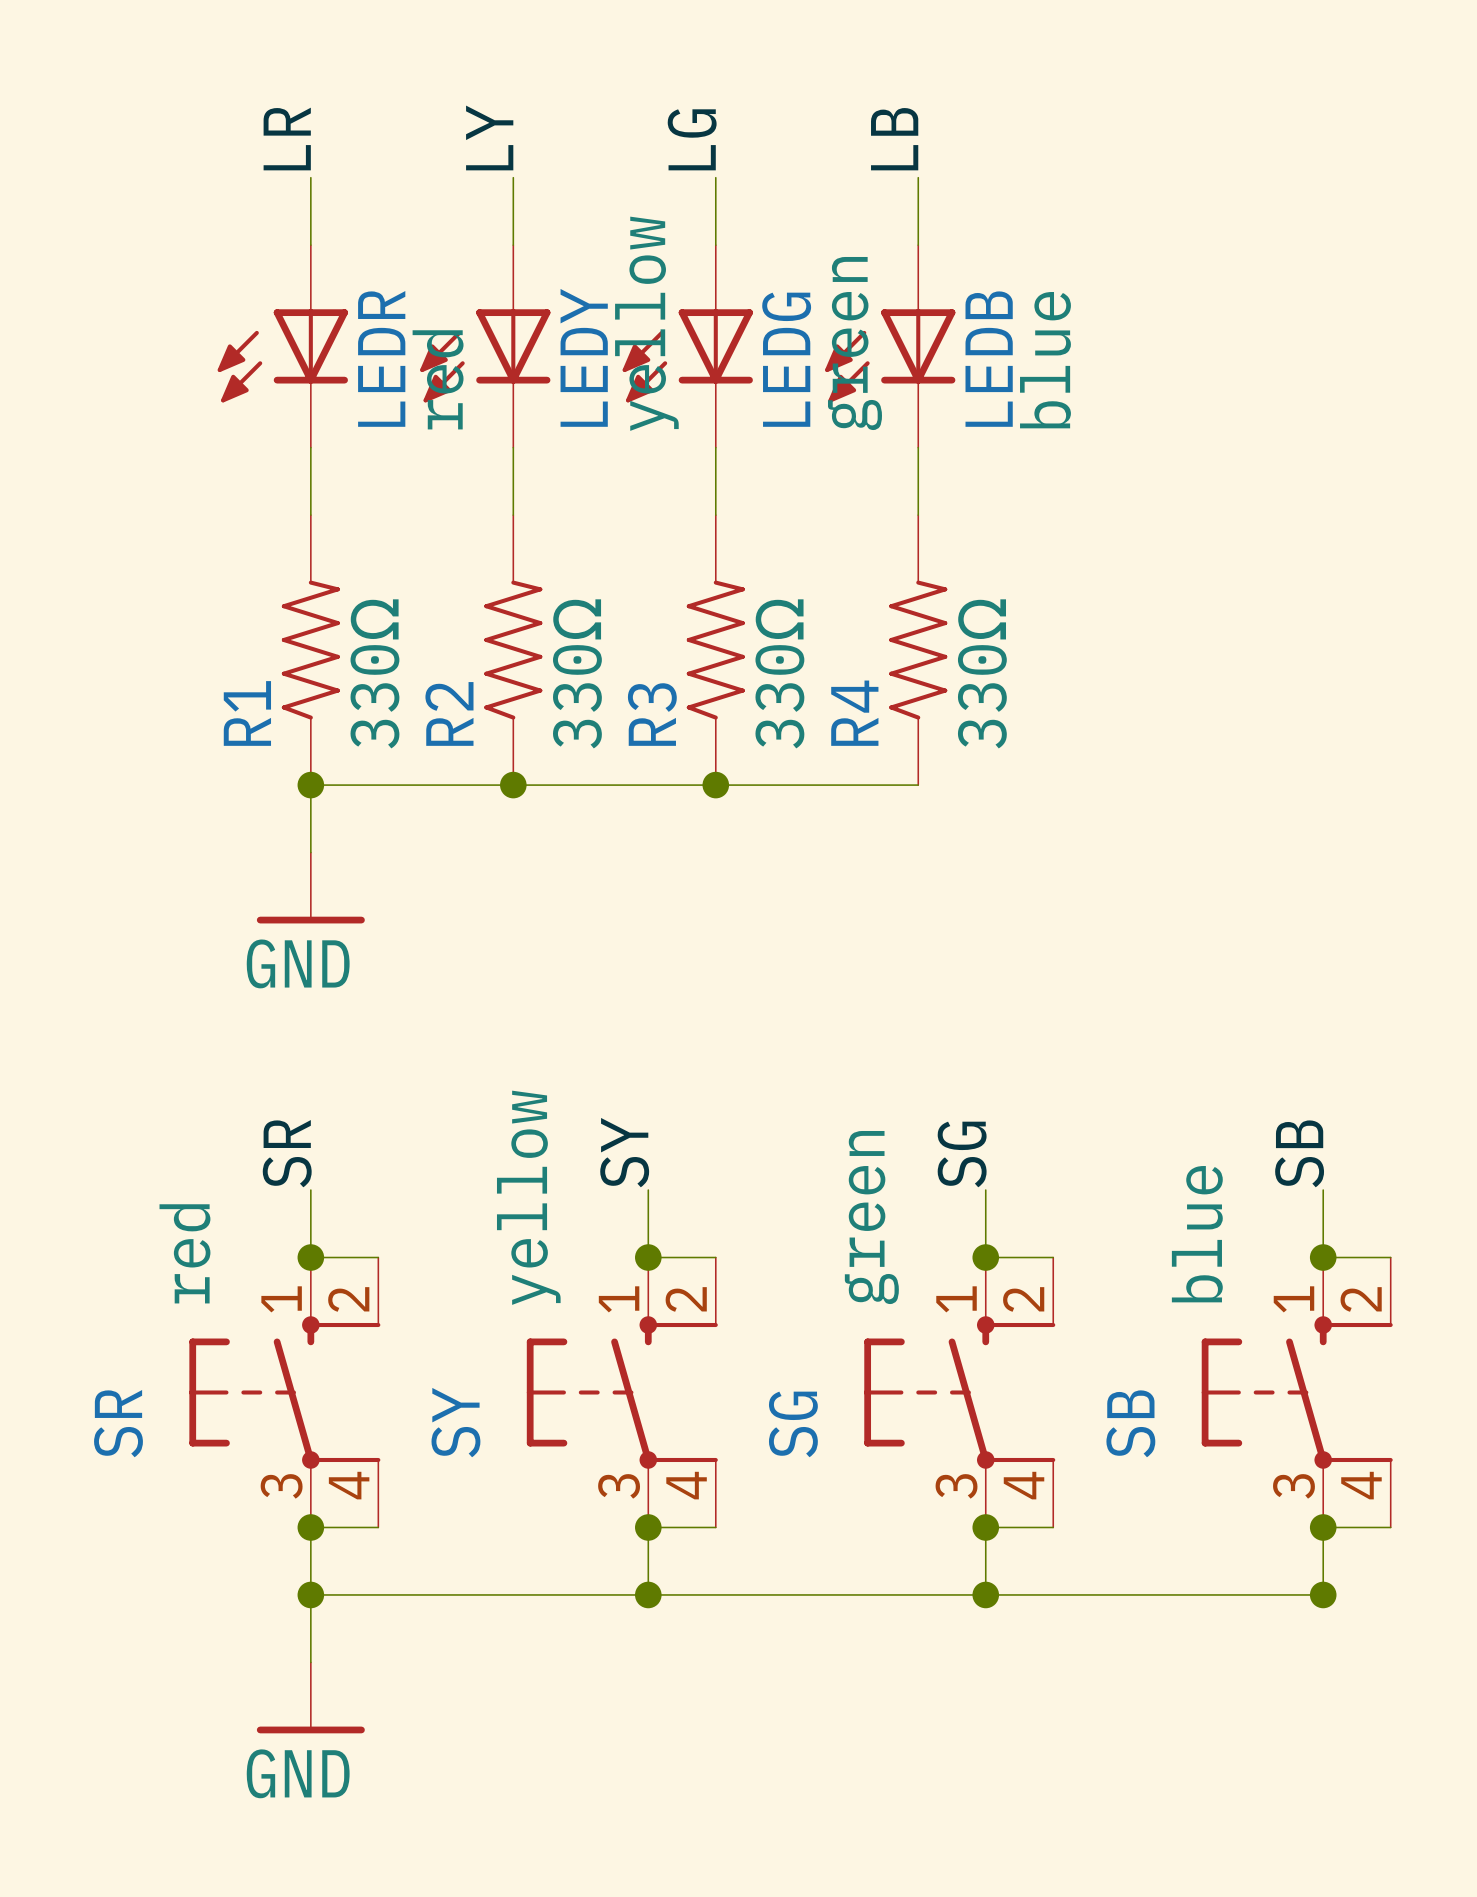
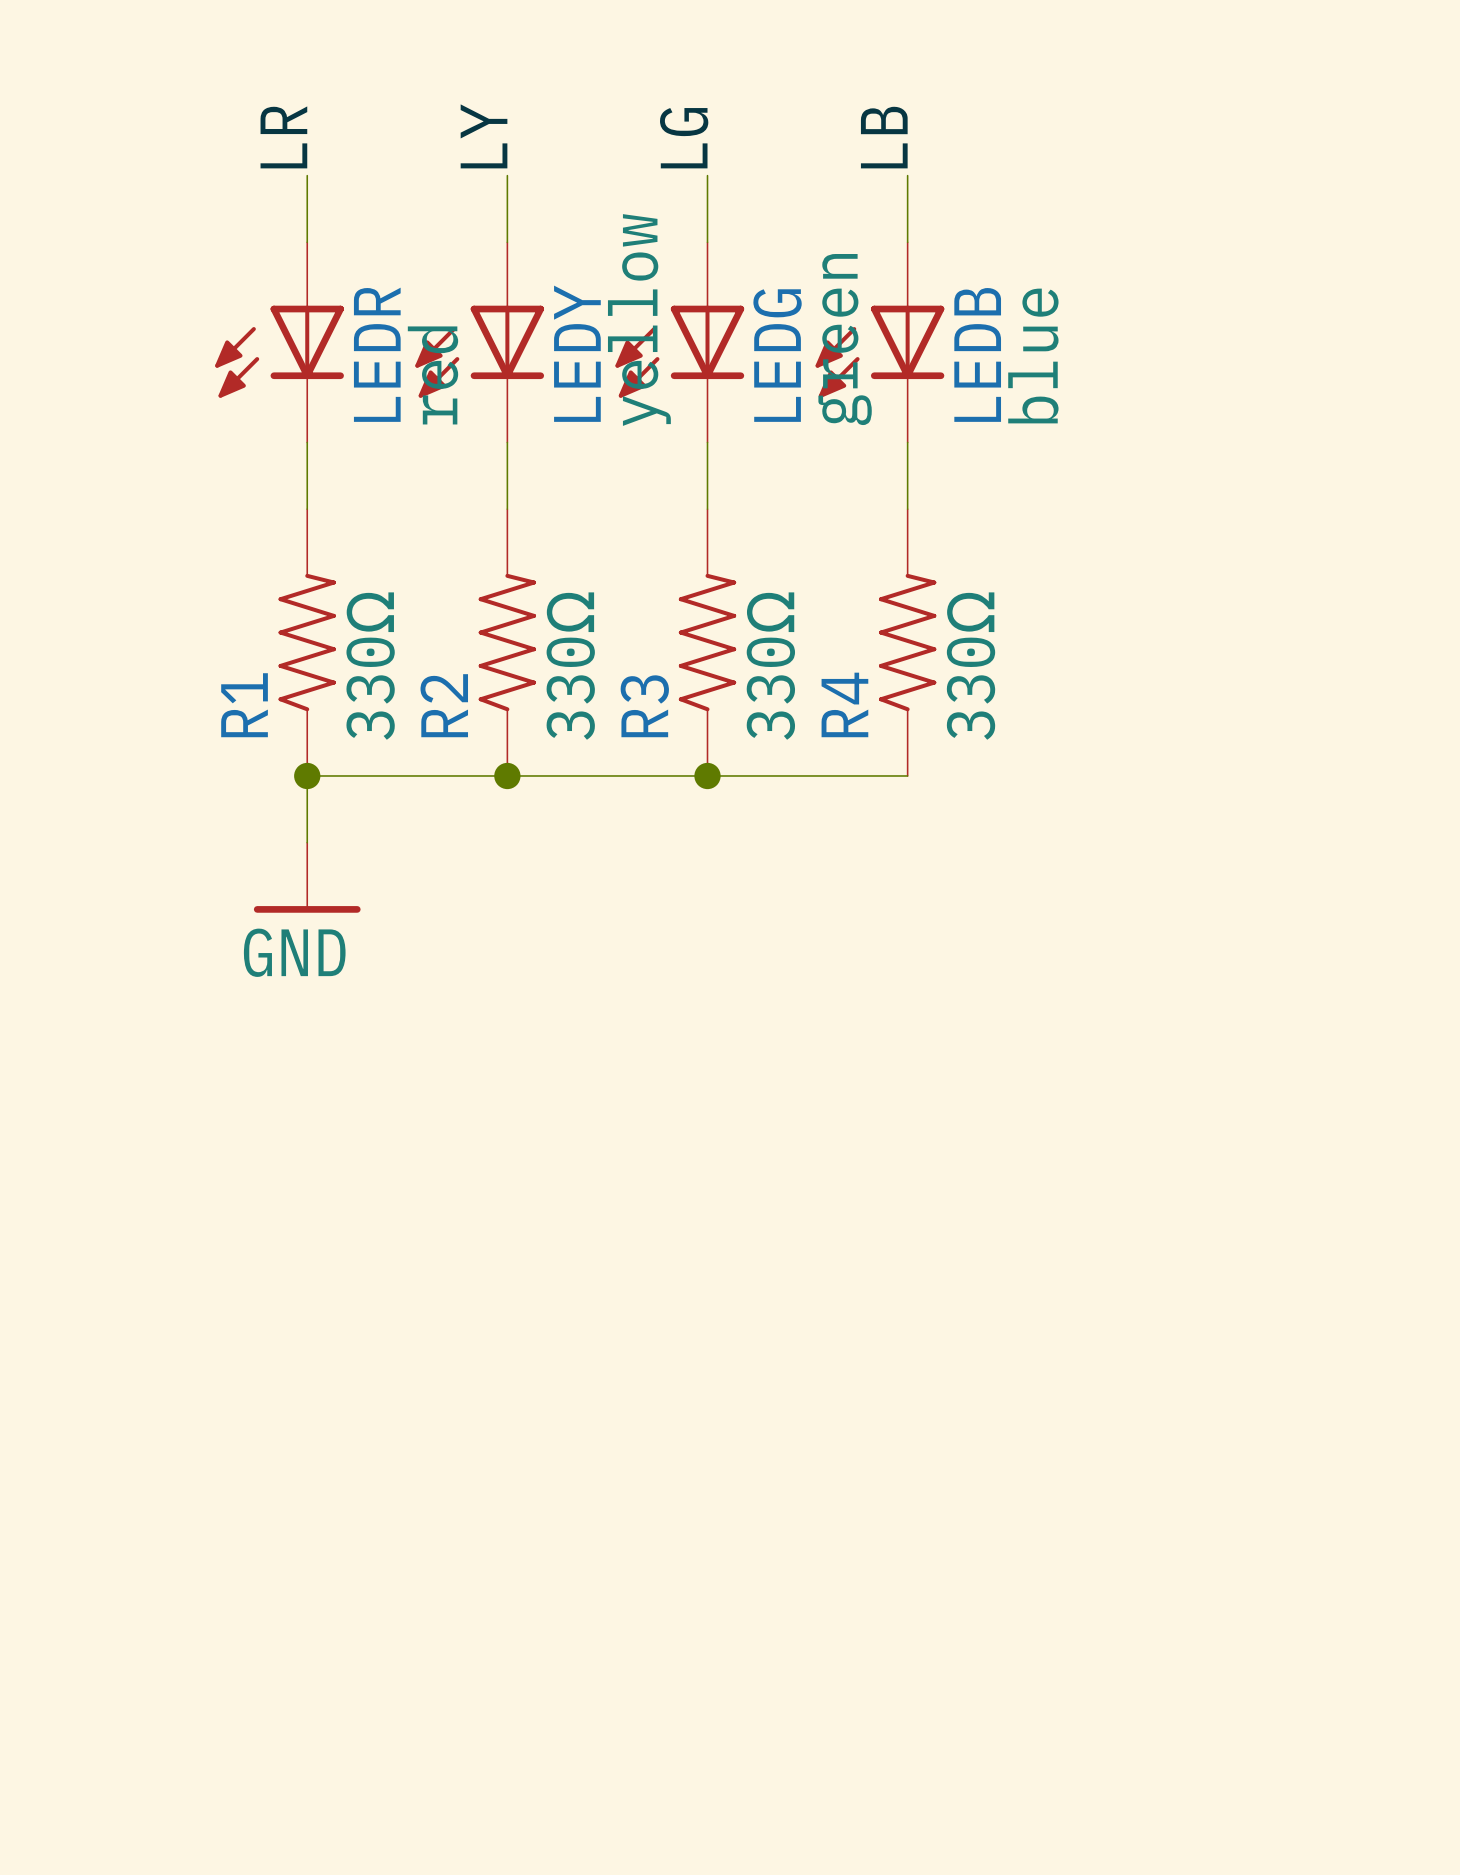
label: SY (624, 1152) -> none
label: SR (287, 1153) -> none
label: SB (1299, 1153) -> none
label: SG (962, 1154) -> none
wire: (310, 1190) (310, 1257) (378, 1257) -> none
wire: (648, 1190) (648, 1257) (715, 1257) -> none
wire: (985, 1190) (985, 1257) (1053, 1257) -> none
wire: (1323, 1190) (1323, 1257) (1390, 1257) -> none
junction: (310, 1257) -> none
junction: (648, 1257) -> none
junction: (985, 1257) -> none
junction: (1323, 1257) -> none
SR: red (284, 1392) -> none
SY: yellow (622, 1392) -> none
SG: green (959, 1392) -> none
SB: blue (1297, 1392) -> none
junction: (310, 1527) -> none
wire: (378, 1527) (310, 1527) (310, 1662) -> none
junction: (648, 1527) -> none
wire: (715, 1527) (648, 1527) (648, 1594) -> none
junction: (985, 1527) -> none
wire: (1053, 1527) (985, 1527) (985, 1594) -> none
junction: (1323, 1527) -> none
wire: (1390, 1527) (1323, 1527) (1323, 1594) (310, 1594) -> none
junction: (310, 1594) -> none
junction: (648, 1594) -> none
junction: (985, 1594) -> none
junction: (1323, 1594) -> none
power symbol: GND (310, 1697) -> none

